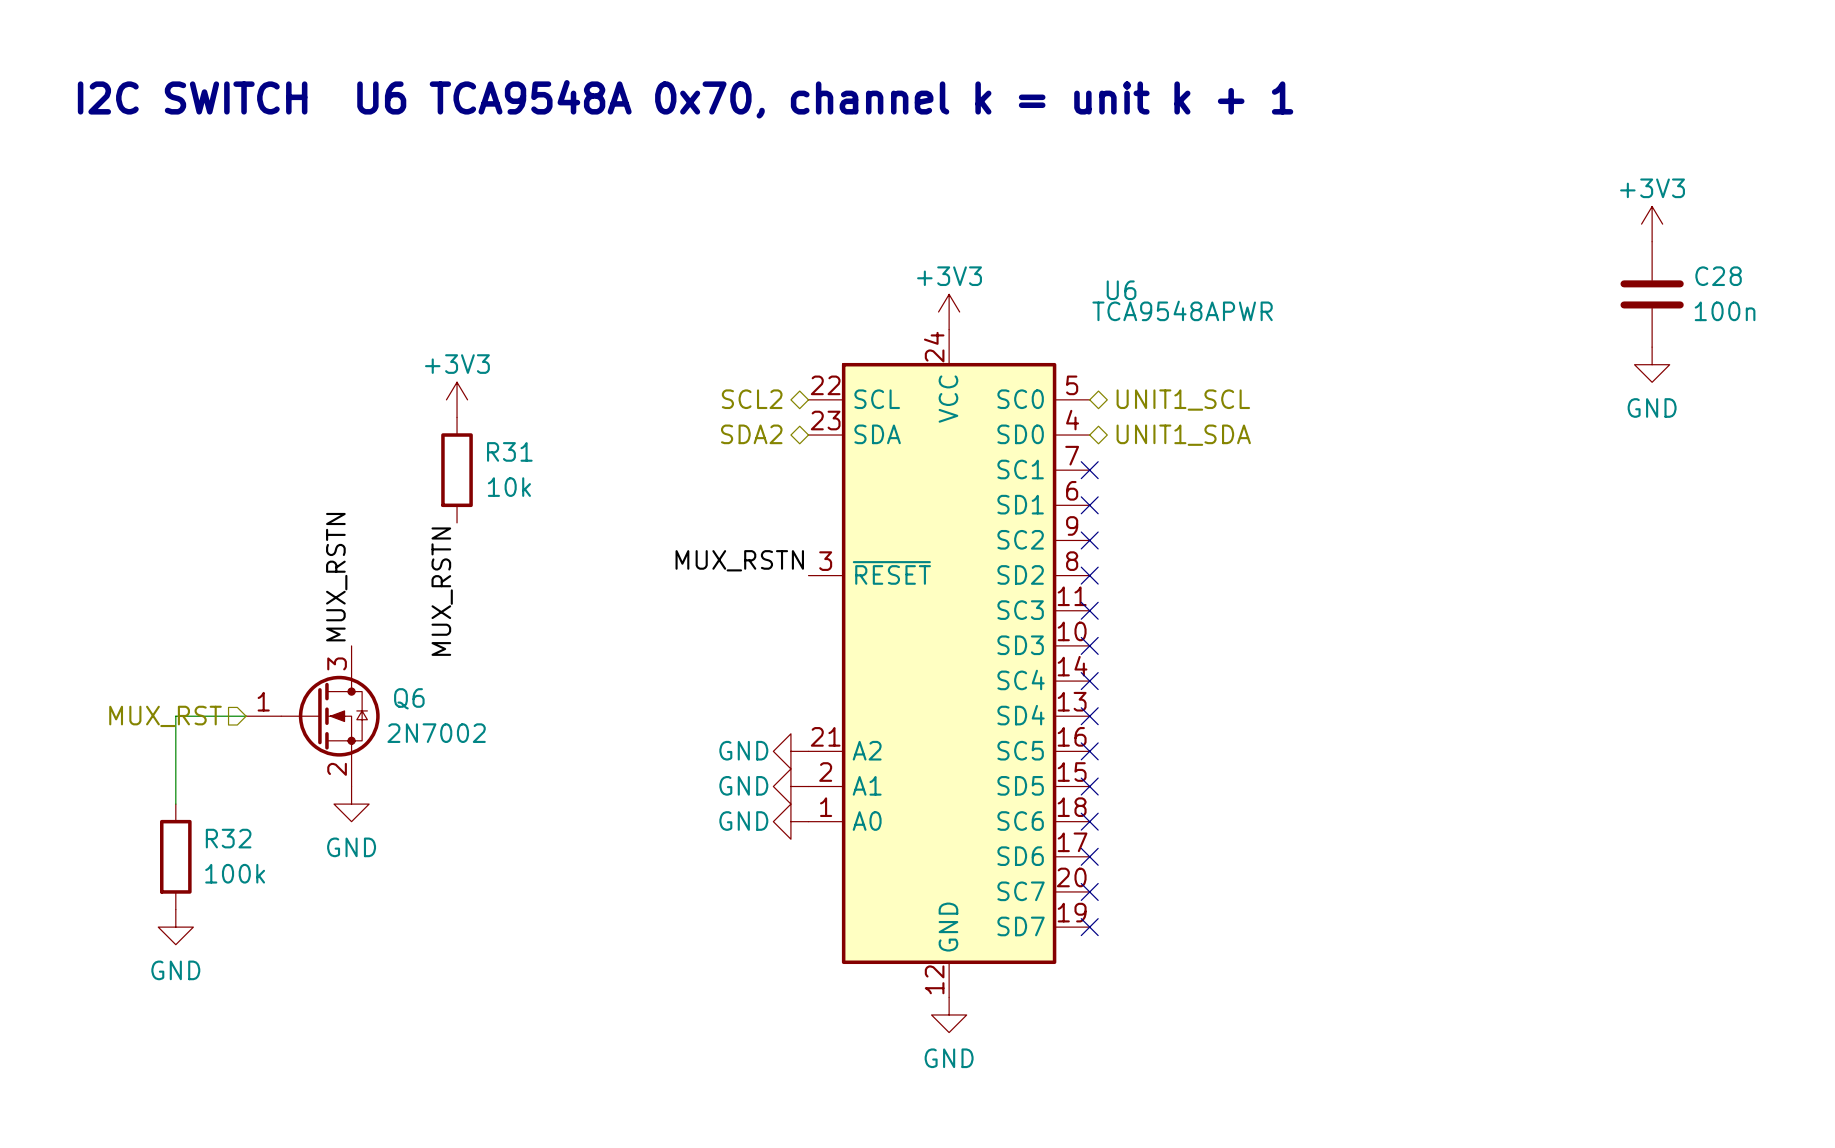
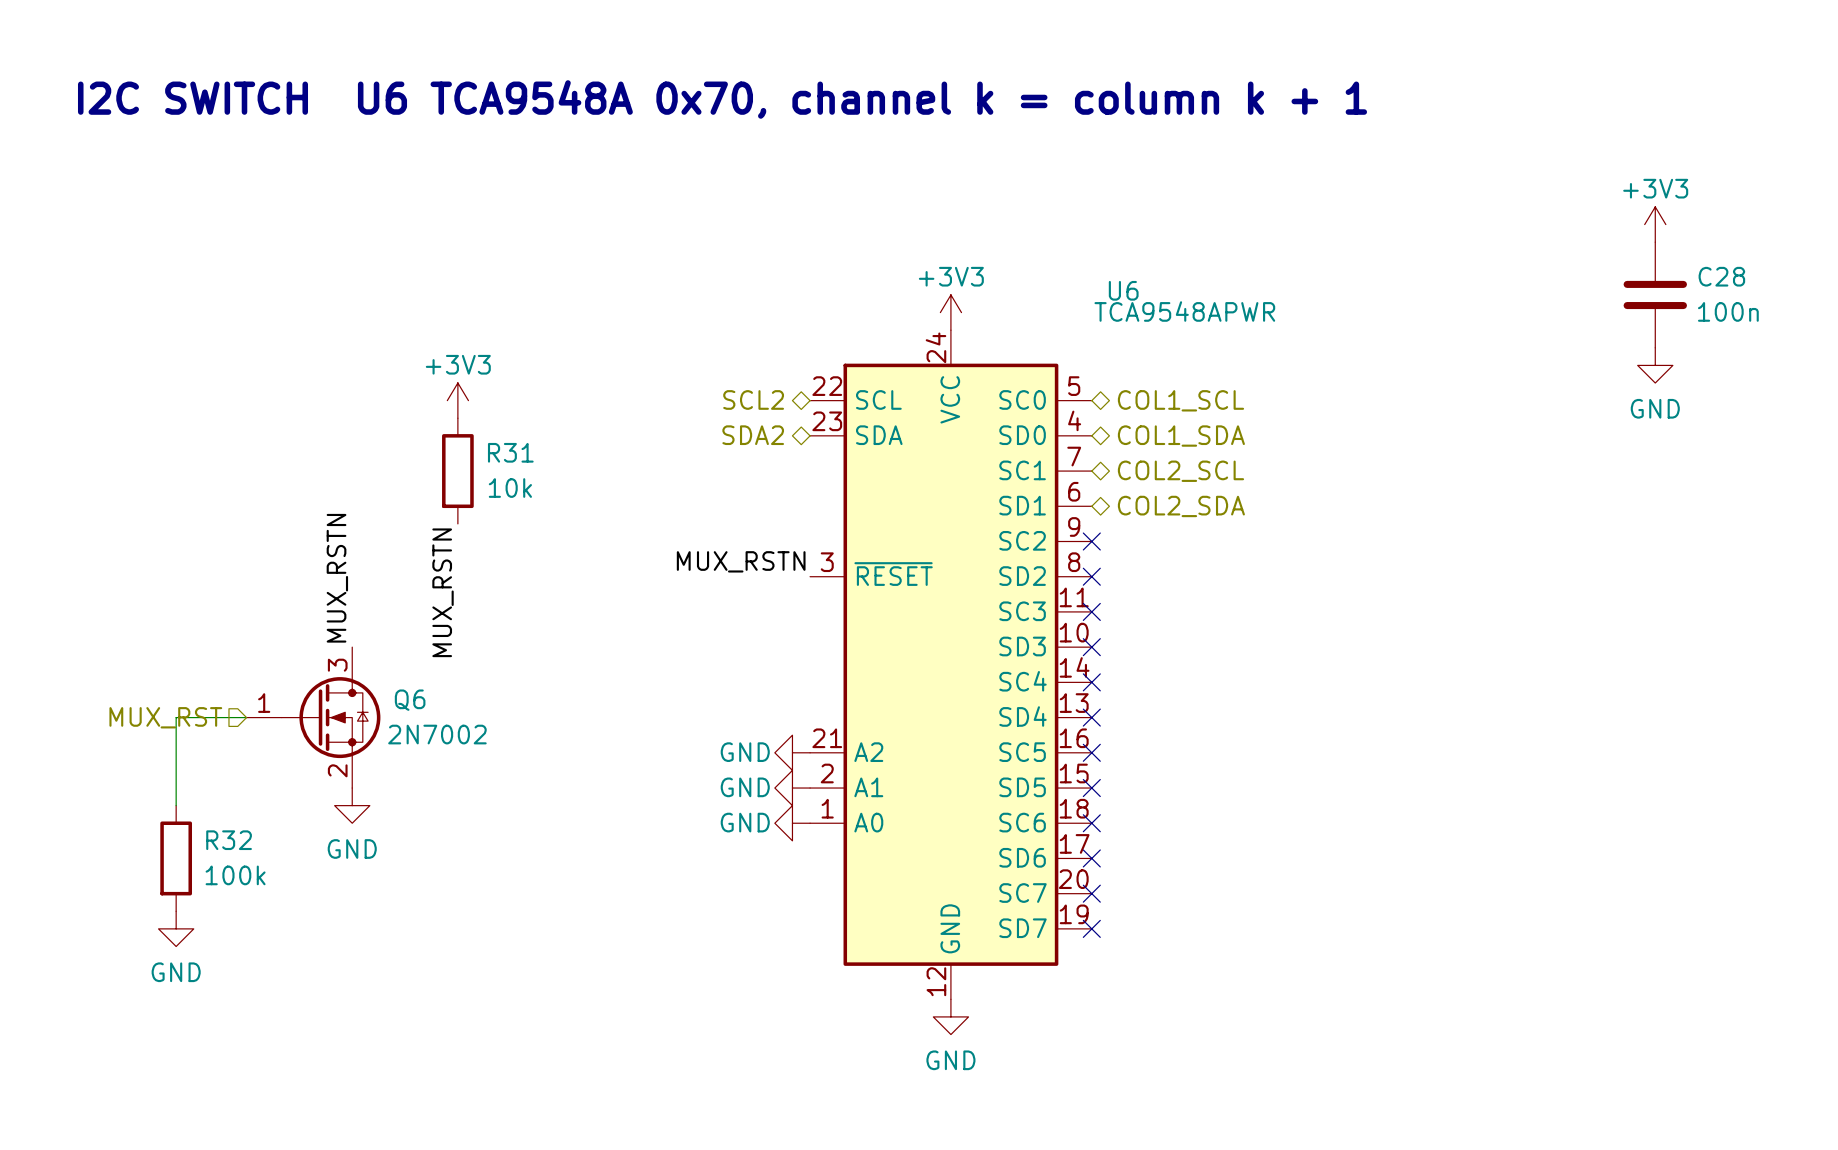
text: I2C SWITCH U6 TCA9548A 0x70, channel k = unit k + 1 (685, 99) -> I2C SWITCH U6 TCA9548A 0x70, channel k = column k + 1 (722, 99)
hierarchical label: UNIT1_SCL (1183, 400) -> COL1_SCL (1180, 400)
hierarchical label: UNIT1_SDA (1183, 435) -> COL1_SDA (1181, 436)
no-connect mark: (1089, 470) -> none
hierarchical label: none -> COL2_SCL (1180, 471)
no-connect mark: (1089, 505) -> none
hierarchical label: none -> COL2_SDA (1181, 506)

